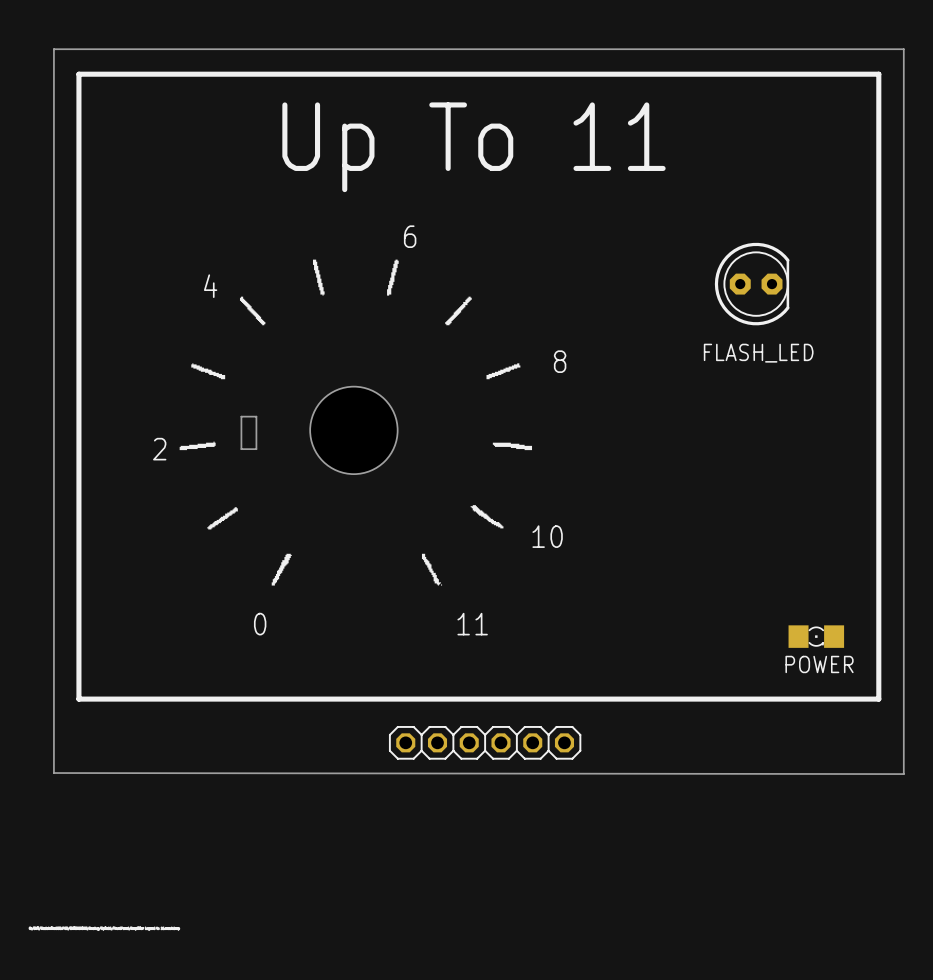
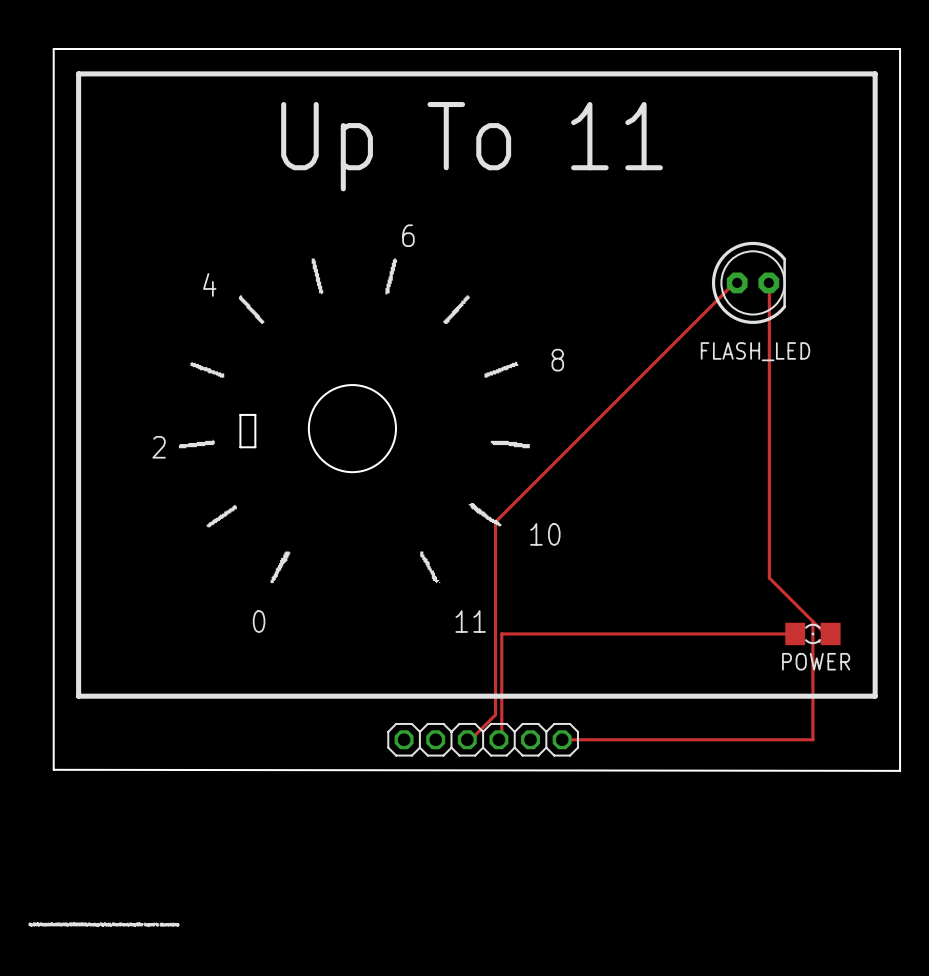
track: none -> (737, 282) (732, 285) (495, 521) (495, 714) (470, 739) (467, 739)
track: none -> (768, 282) (769, 577) (825, 633) (830, 633)
track: none -> (812, 621) (812, 739) (562, 739)
track: none -> (795, 633) (501, 633) (501, 739) (498, 739)

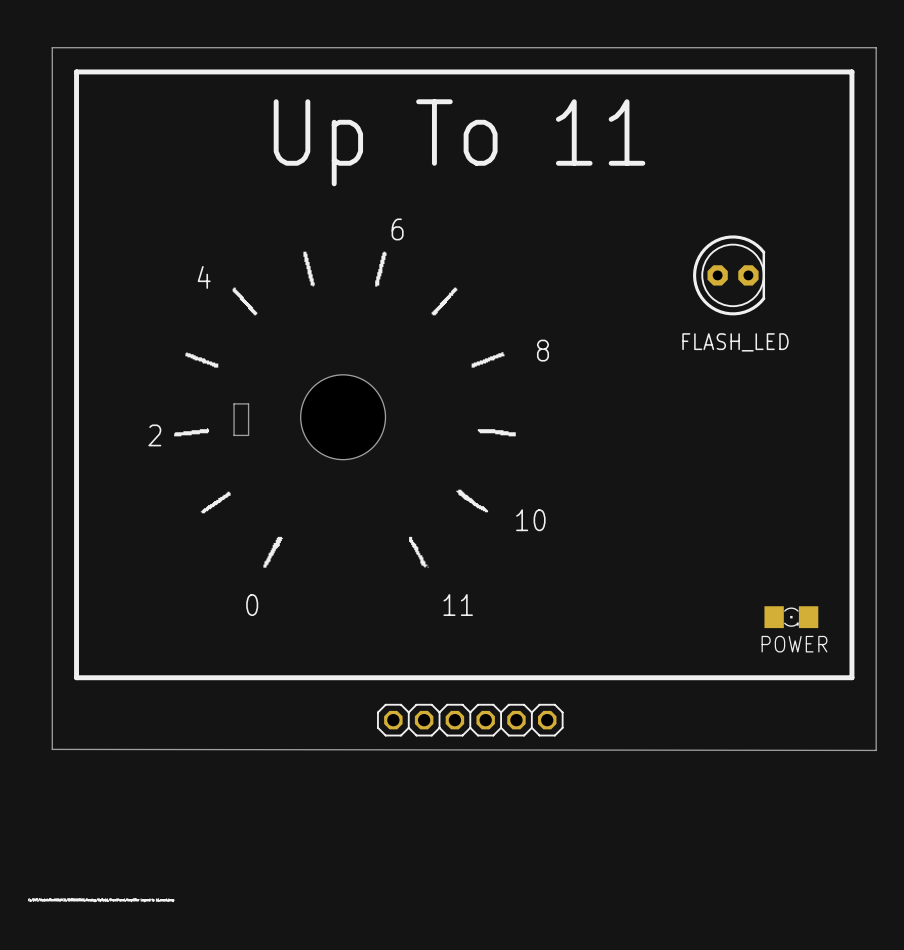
track: (737, 282) (732, 285) (495, 521) (495, 714) (470, 739) (467, 739) -> none
track: (768, 282) (769, 577) (825, 633) (830, 633) -> none
track: (812, 621) (812, 739) (562, 739) -> none
track: (795, 633) (501, 633) (501, 739) (498, 739) -> none

